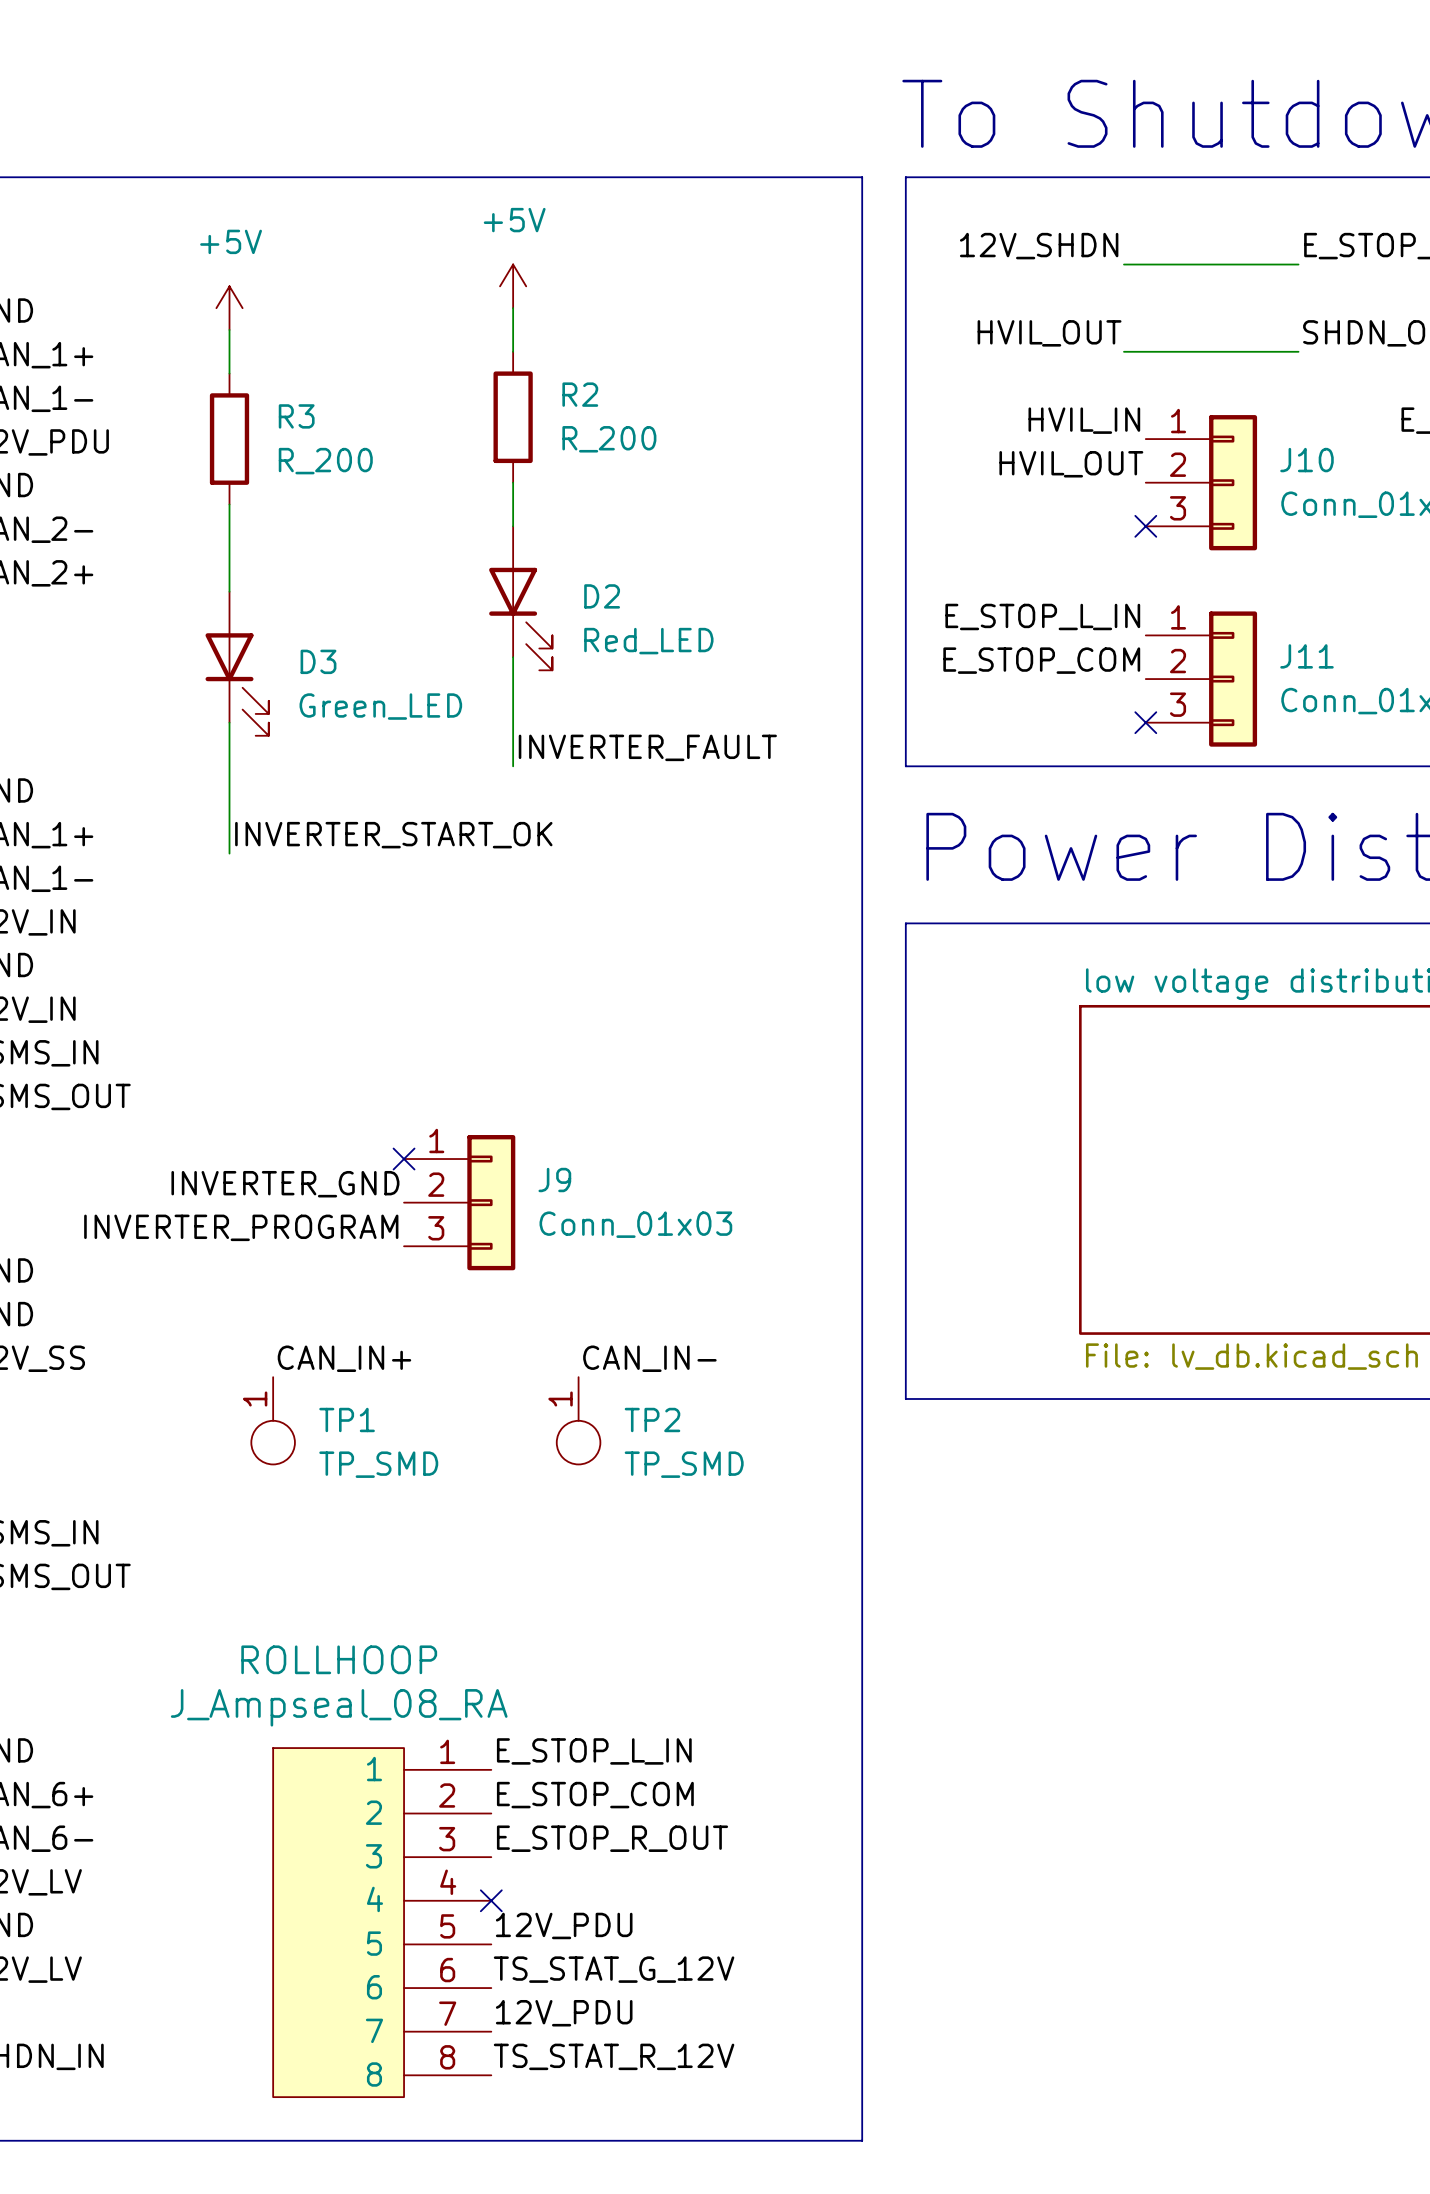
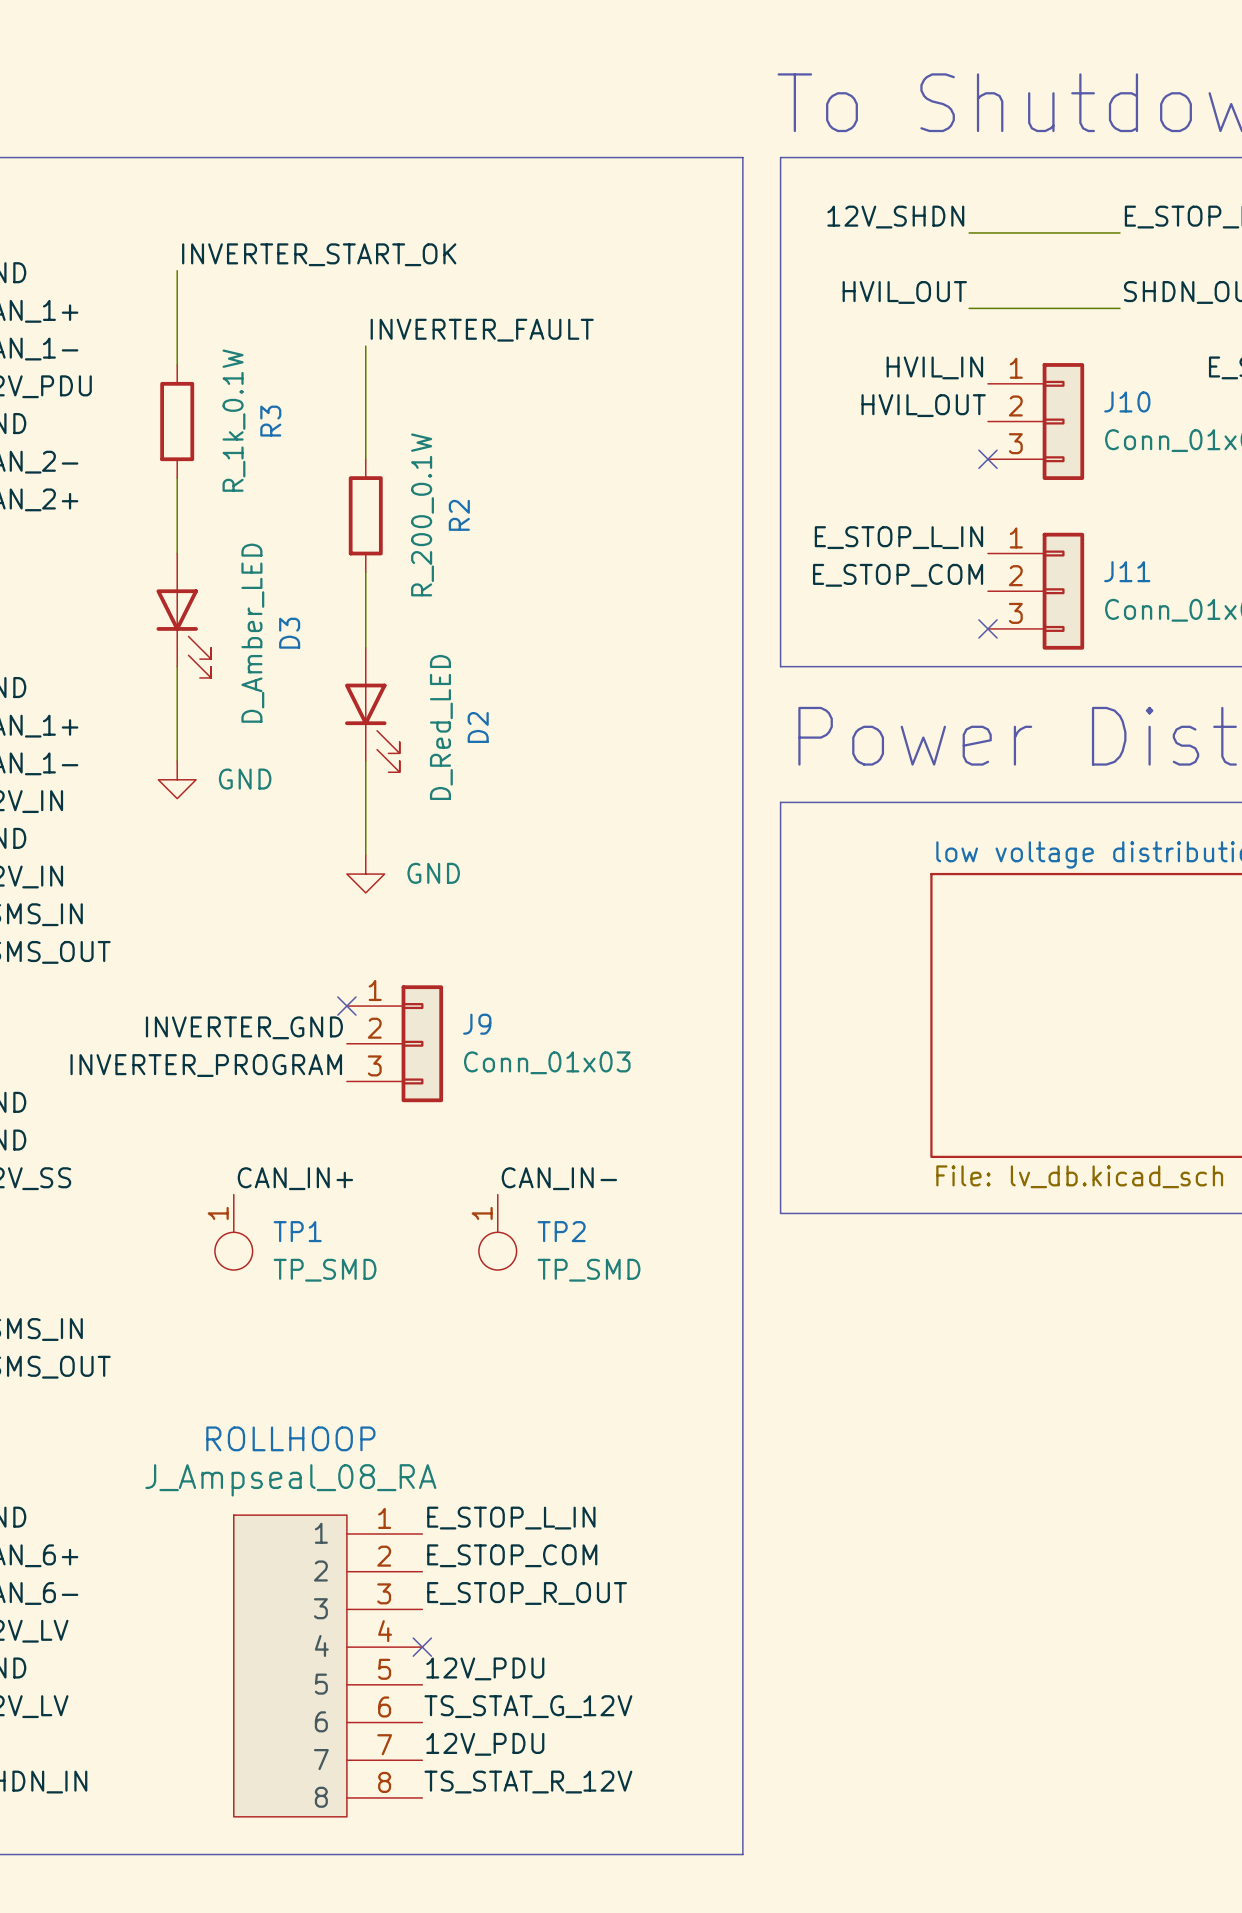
power symbol: +5V (513, 286) -> none
label: none -> INVERTER_START_OK (319, 254)
wire: none -> (177, 270) (177, 364)
power symbol: +5V (229, 308) -> none
wire: (513, 308) (513, 351) -> none
wire: (229, 329) (229, 373) -> none
R2 name rotation: 0° (580, 394) -> 90° counterclockwise (459, 515)
R3 name rotation: 0° (296, 416) -> 90° counterclockwise (270, 421)
R2 position: (513, 417) -> (365, 515)
R3 position: (229, 439) -> (177, 421)
R2 value: R_200 (609, 439) -> R_200_0.1W (422, 514)
R3 value: R_200 (325, 461) -> R_1k_0.1W (233, 420)
wire: (513, 482) (513, 526) -> none
wire: (229, 504) (229, 591) -> (177, 478) (177, 553)
D2 name rotation: 0° (602, 596) -> 90° counterclockwise (478, 727)
D2 position: (520, 598) -> (372, 710)
D2 value: Red_LED (648, 641) -> D_Red_LED (441, 727)
wire: none -> (365, 572) (365, 647)
wire: (513, 657) (513, 766) -> (365, 760) (365, 855)
D3 name rotation: 0° (318, 661) -> 90° counterclockwise (289, 633)
D3 position: (237, 663) -> (183, 615)
D3 value: Green_LED (380, 706) -> D_Amber_LED (252, 633)
wire: (229, 722) (229, 853) -> (365, 346) (365, 459)
label position: INVERTER_FAULT (647, 747) -> INVERTER_FAULT (482, 330)
wire: none -> (177, 666) (177, 760)
label: INVERTER_START_OK (393, 835) -> none
power symbol: none -> GND (177, 779)
power symbol: none -> GND (365, 874)

